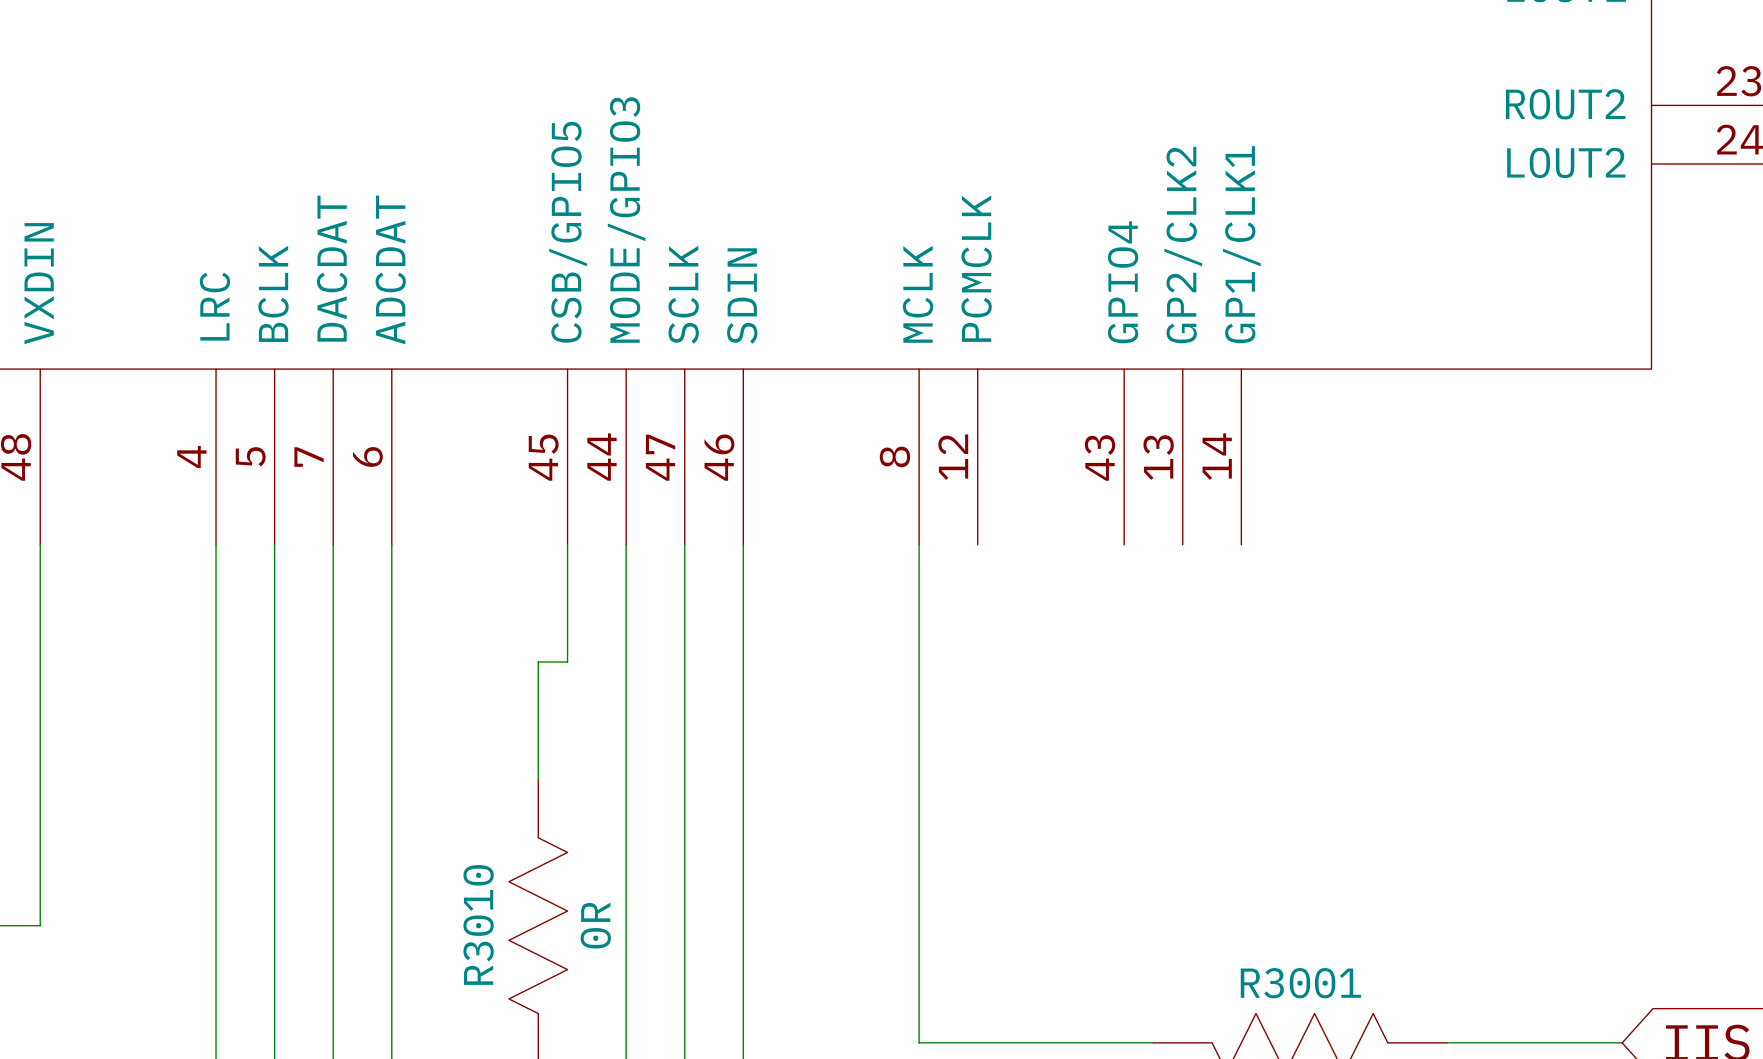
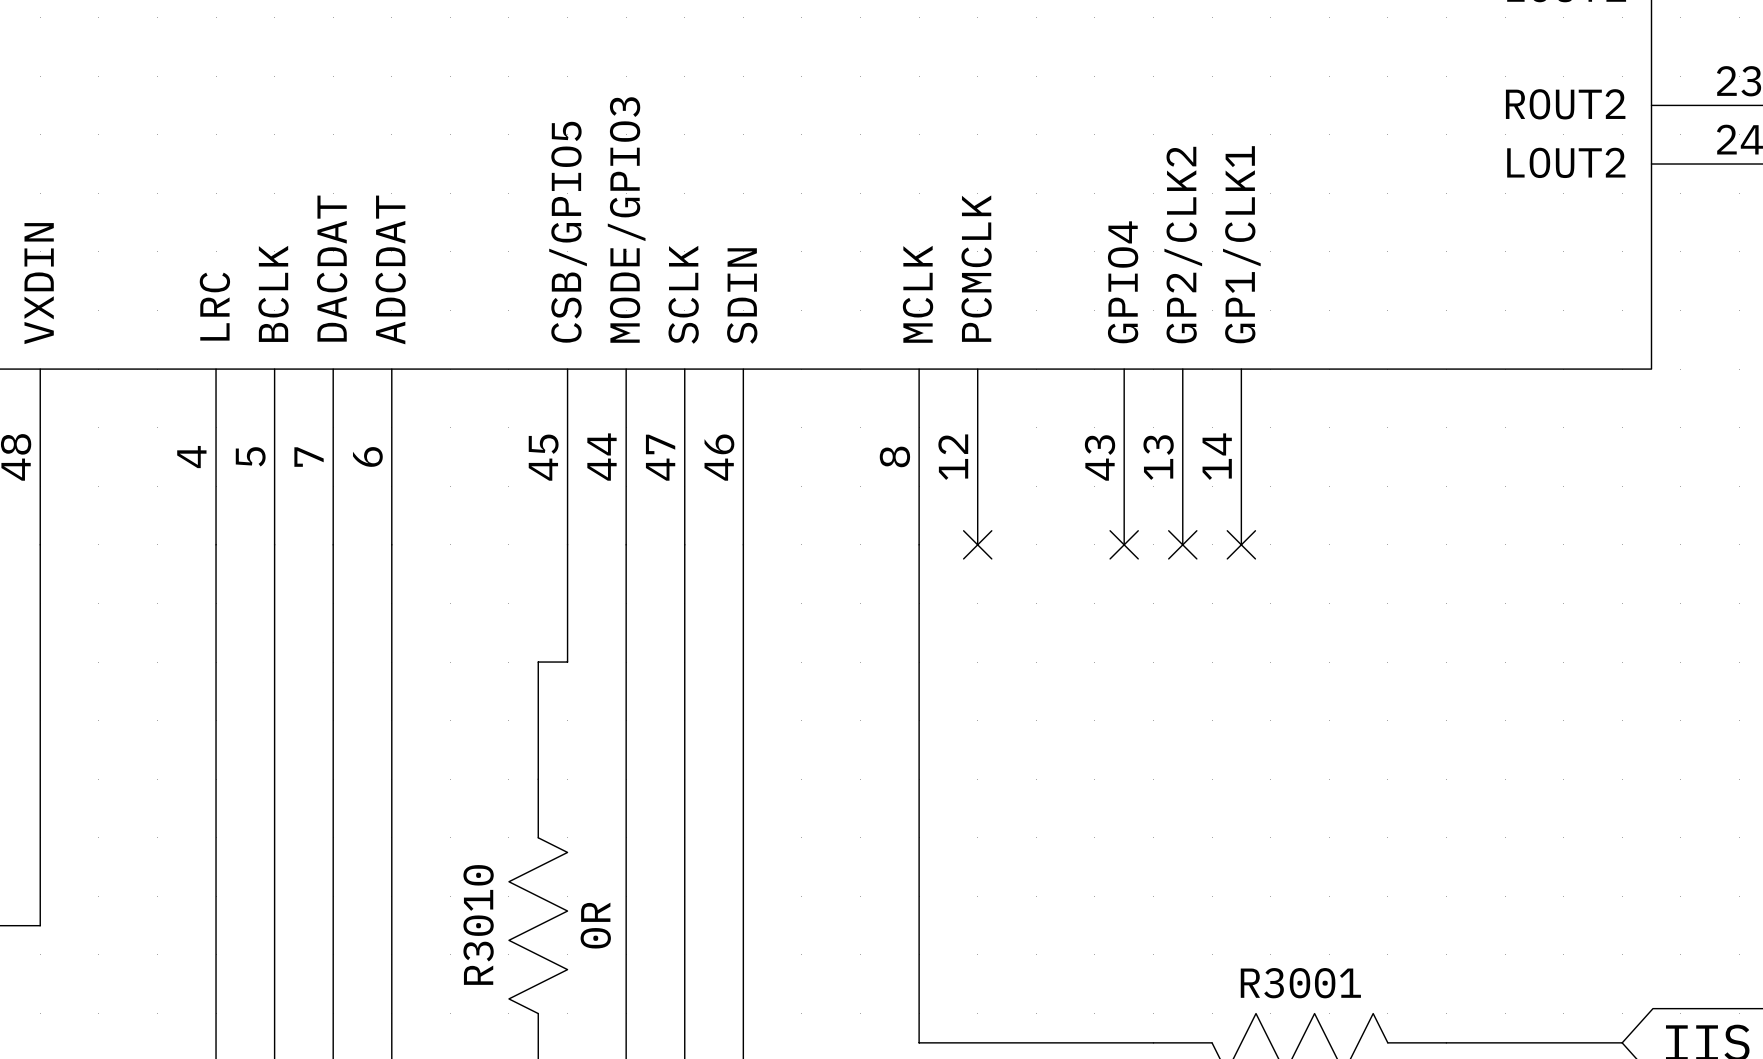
no-connect mark: none -> (977, 544)
no-connect mark: none -> (1124, 544)
no-connect mark: none -> (1182, 544)
no-connect mark: none -> (1241, 544)

